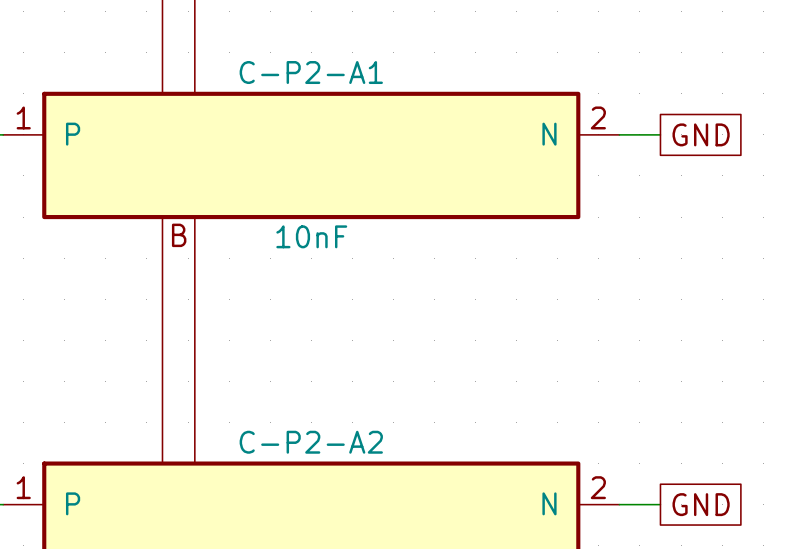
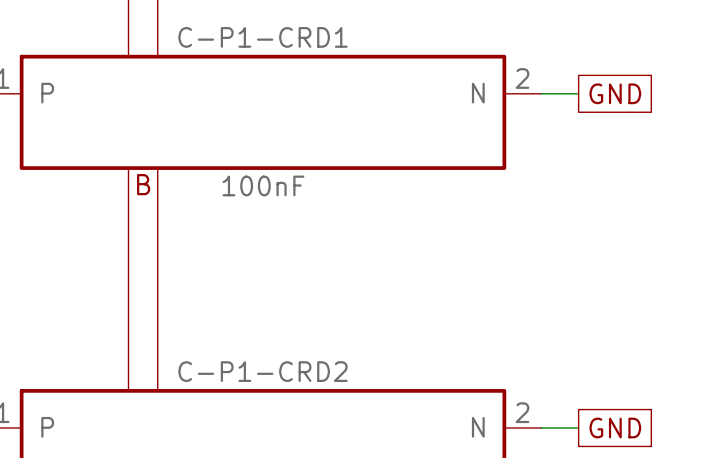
C-P2-A1 name: C-P2-A1 (311, 72) -> C-P1-CRD1 (263, 37)
C-P2-A1 value: 10nF (311, 236) -> 100nF (263, 185)
C-P2-A2 name: C-P2-A2 (311, 442) -> C-P1-CRD2 (263, 371)

